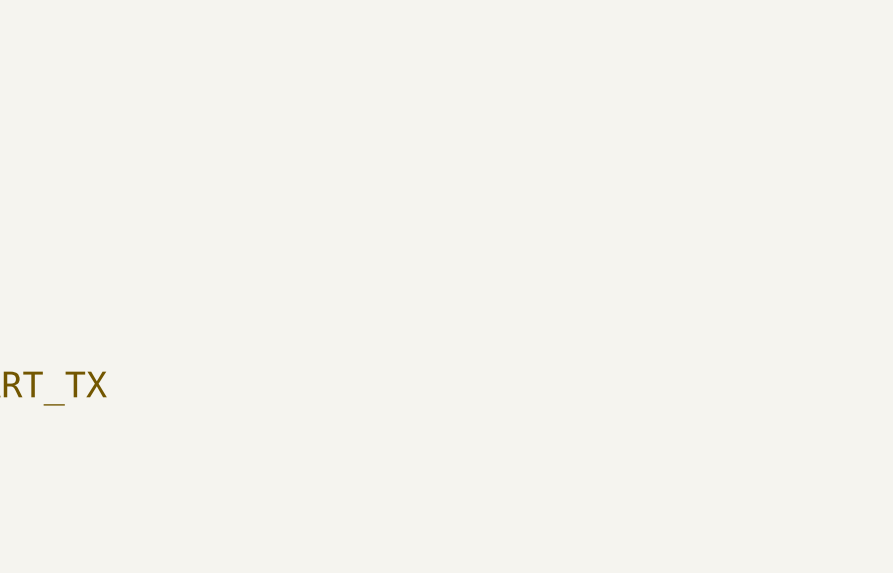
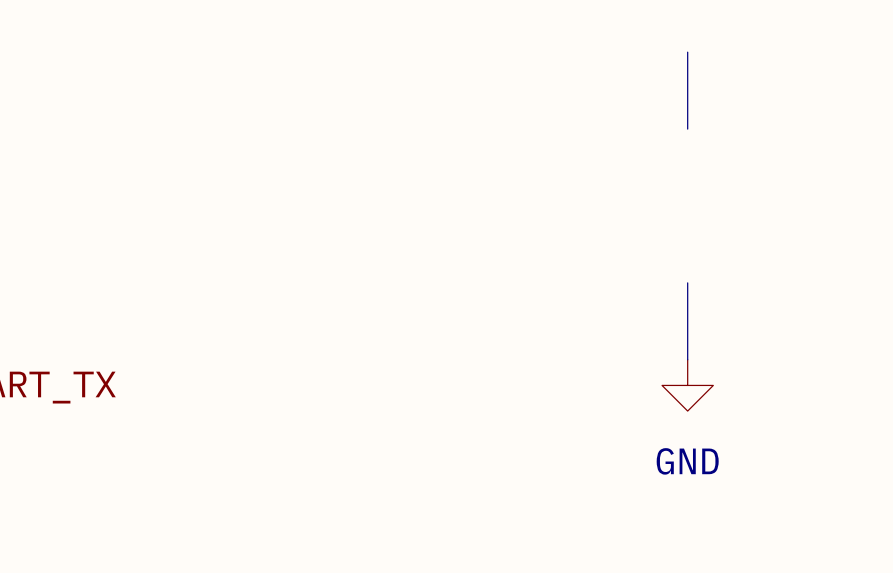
wire: none -> (687, 52) (687, 129)
wire: none -> (687, 282) (687, 359)
power symbol: none -> GND (687, 385)

